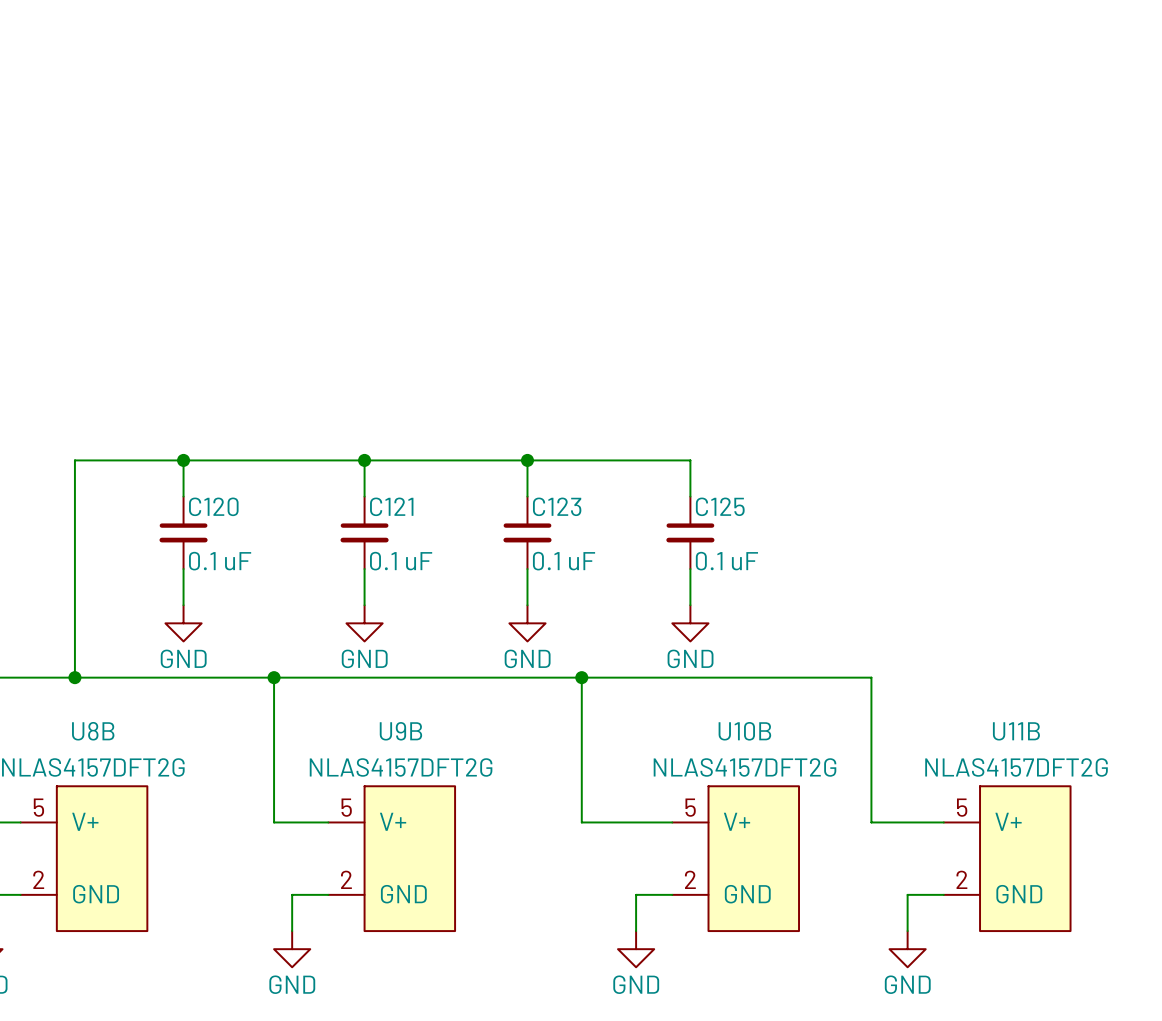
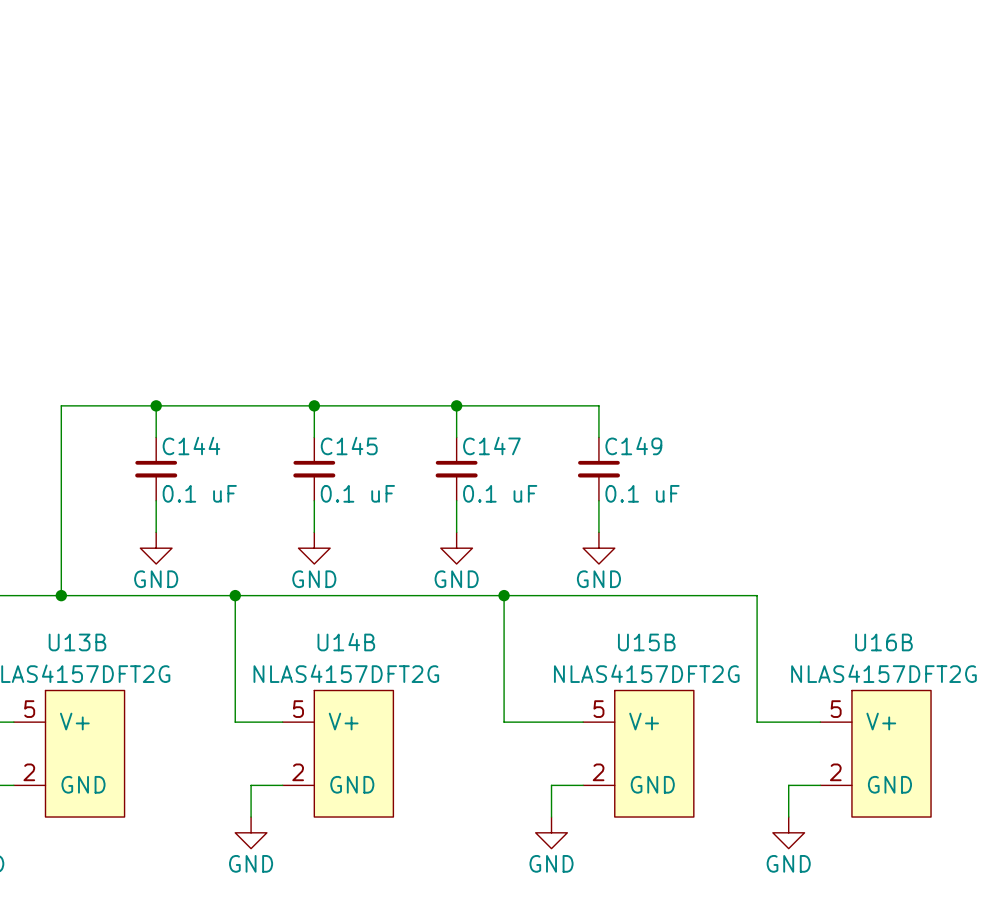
C120 name: C120 (213, 506) -> C144 (191, 446)
C121 name: C121 (391, 506) -> C145 (349, 446)
C123 name: C123 (557, 506) -> C147 (491, 446)
C125 name: C125 (720, 506) -> C149 (633, 446)
U8B name: U8B (93, 731) -> U13B (77, 642)
U9B name: U9B (400, 731) -> U14B (346, 642)
U10B name: U10B (744, 731) -> U15B (646, 642)
U11B name: U11B (1016, 731) -> U16B (883, 642)

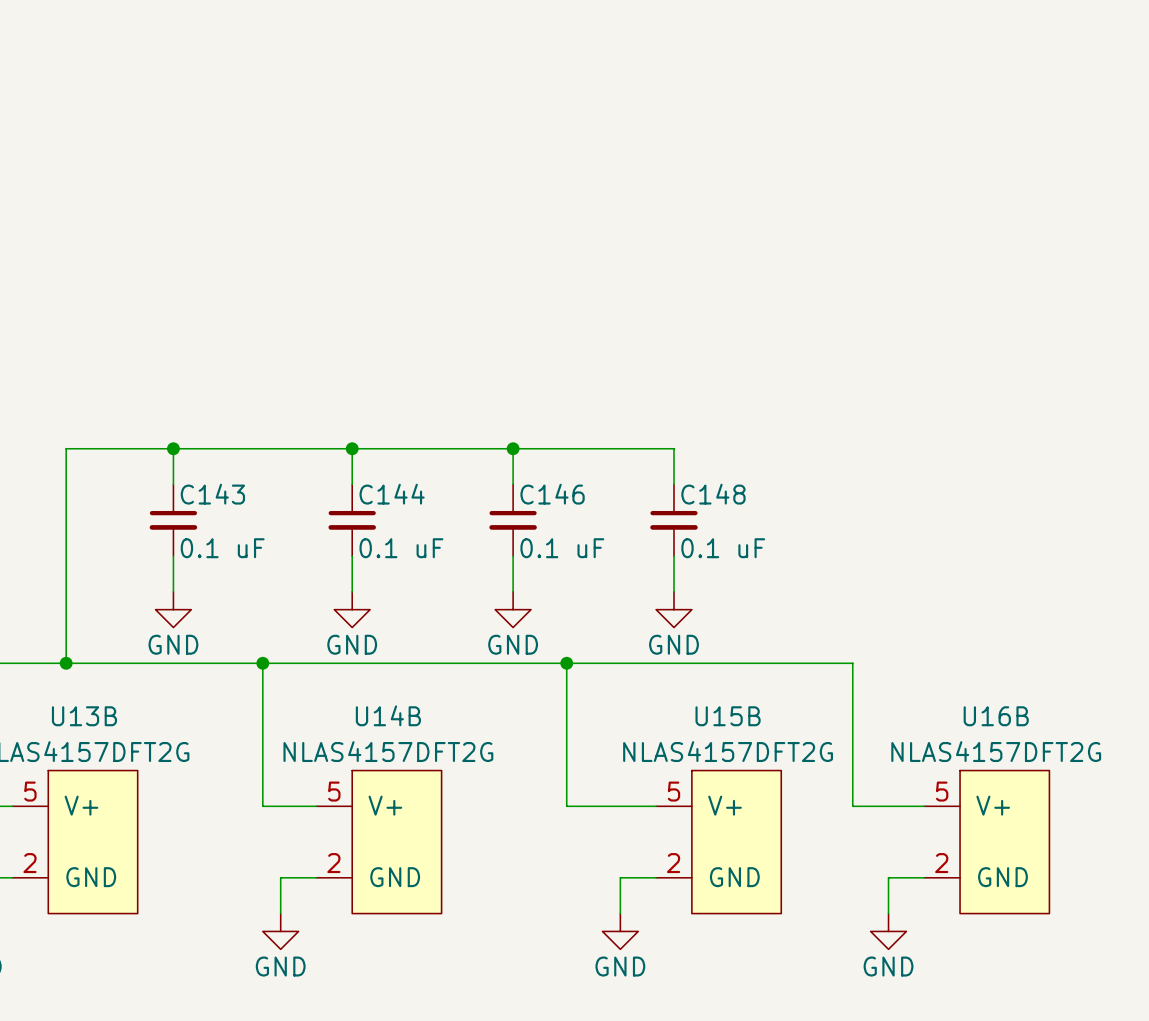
C144 name: C144 (191, 446) -> C143 (212, 494)
C145 name: C145 (349, 446) -> C144 (392, 494)
C147 name: C147 (491, 446) -> C146 (552, 494)
C149 name: C149 (633, 446) -> C148 (713, 494)

